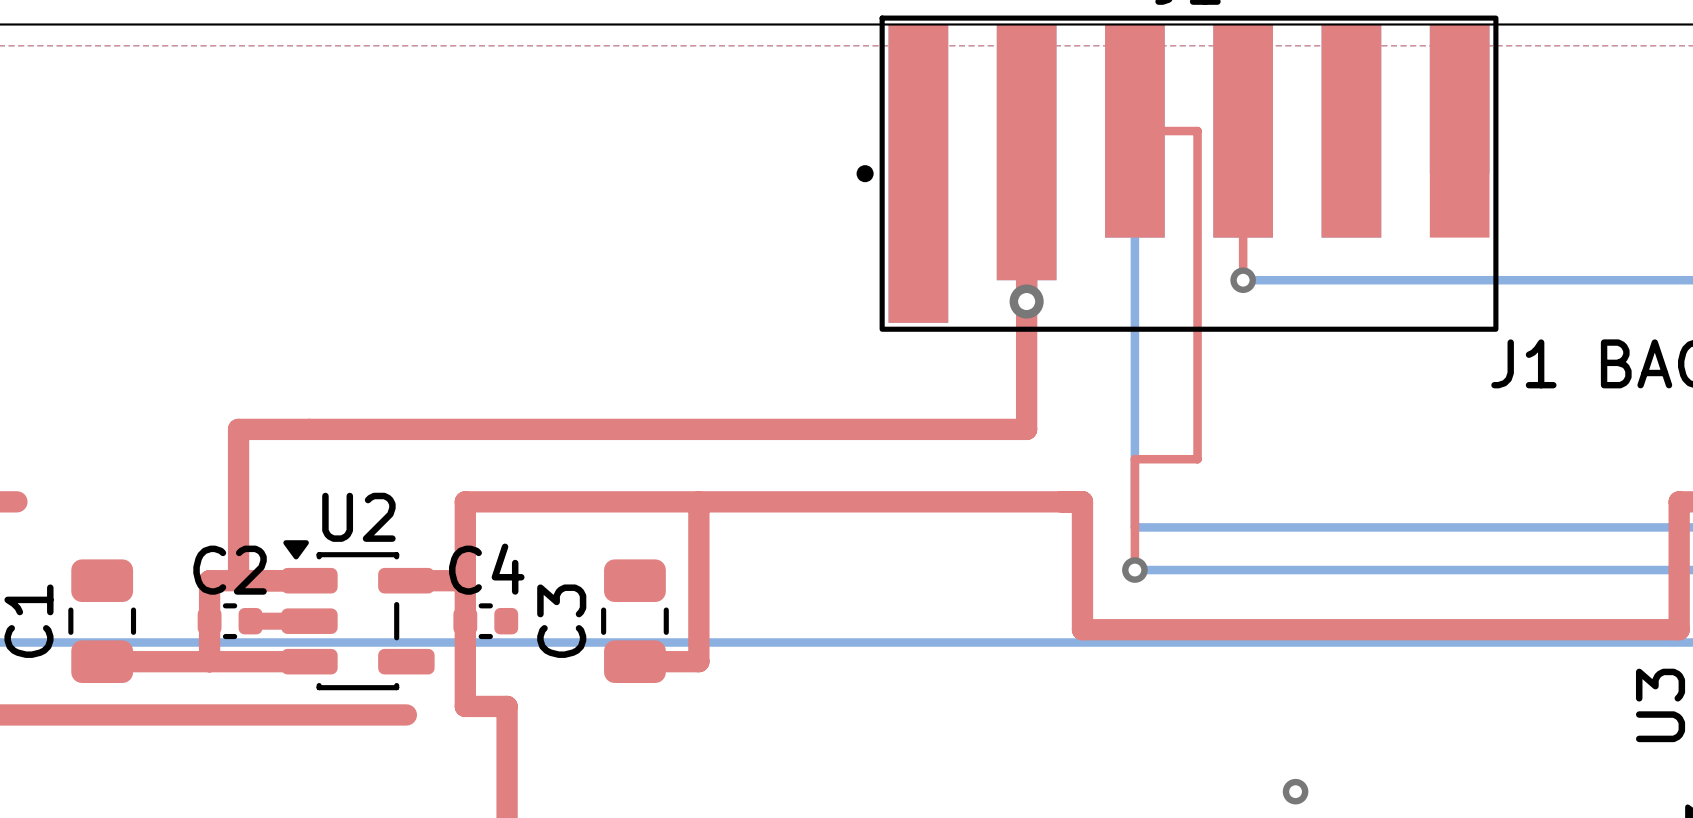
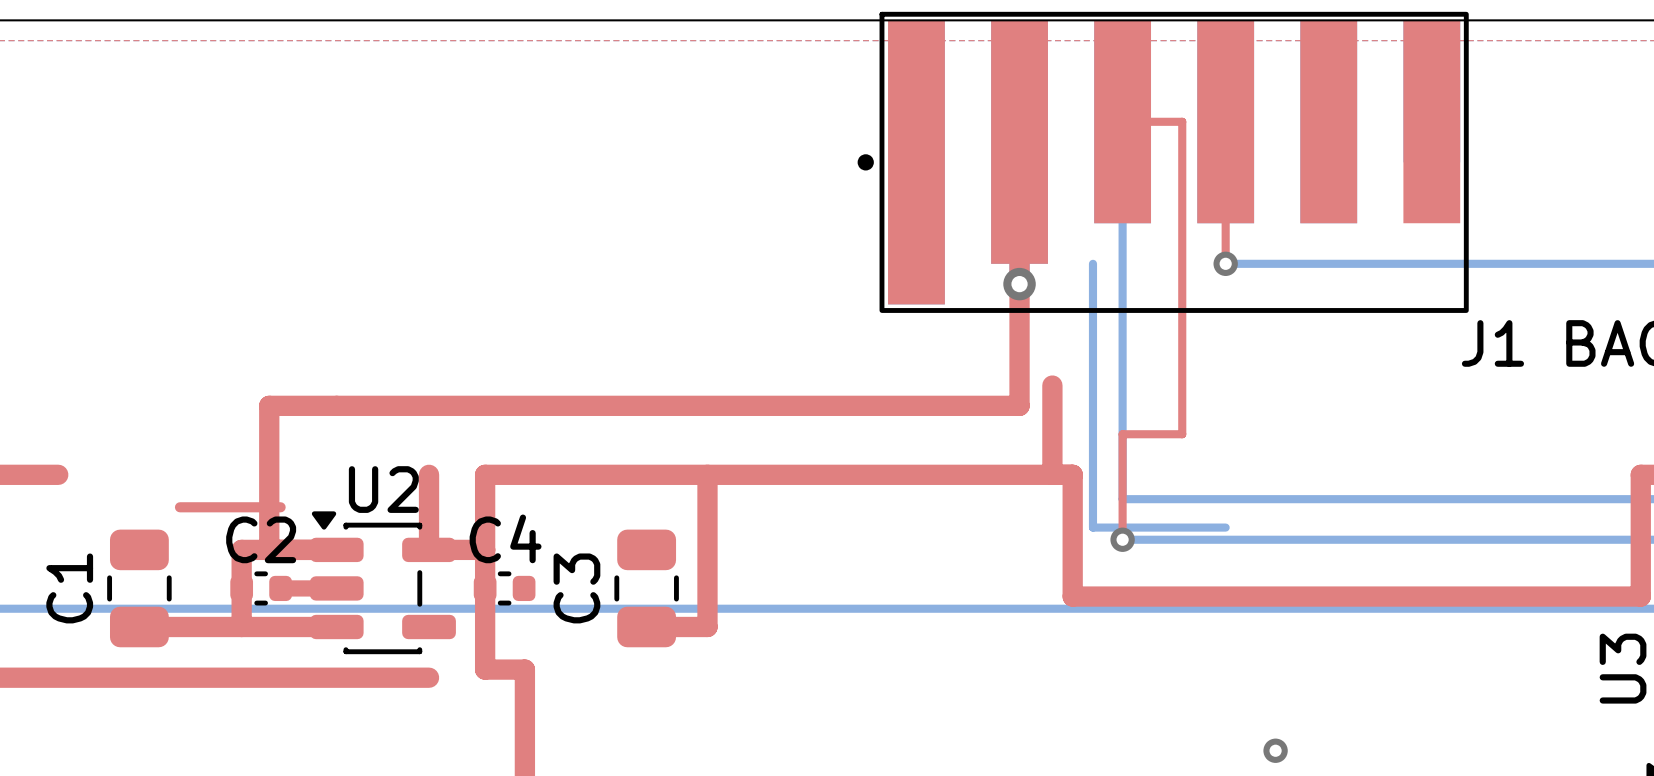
bottom track: none -> (1092, 263) (1092, 527) (1225, 527)
top track: none -> (1052, 385) (1052, 474)
top track: none -> (429, 474) (429, 549)
top track: none -> (179, 507) (280, 507)

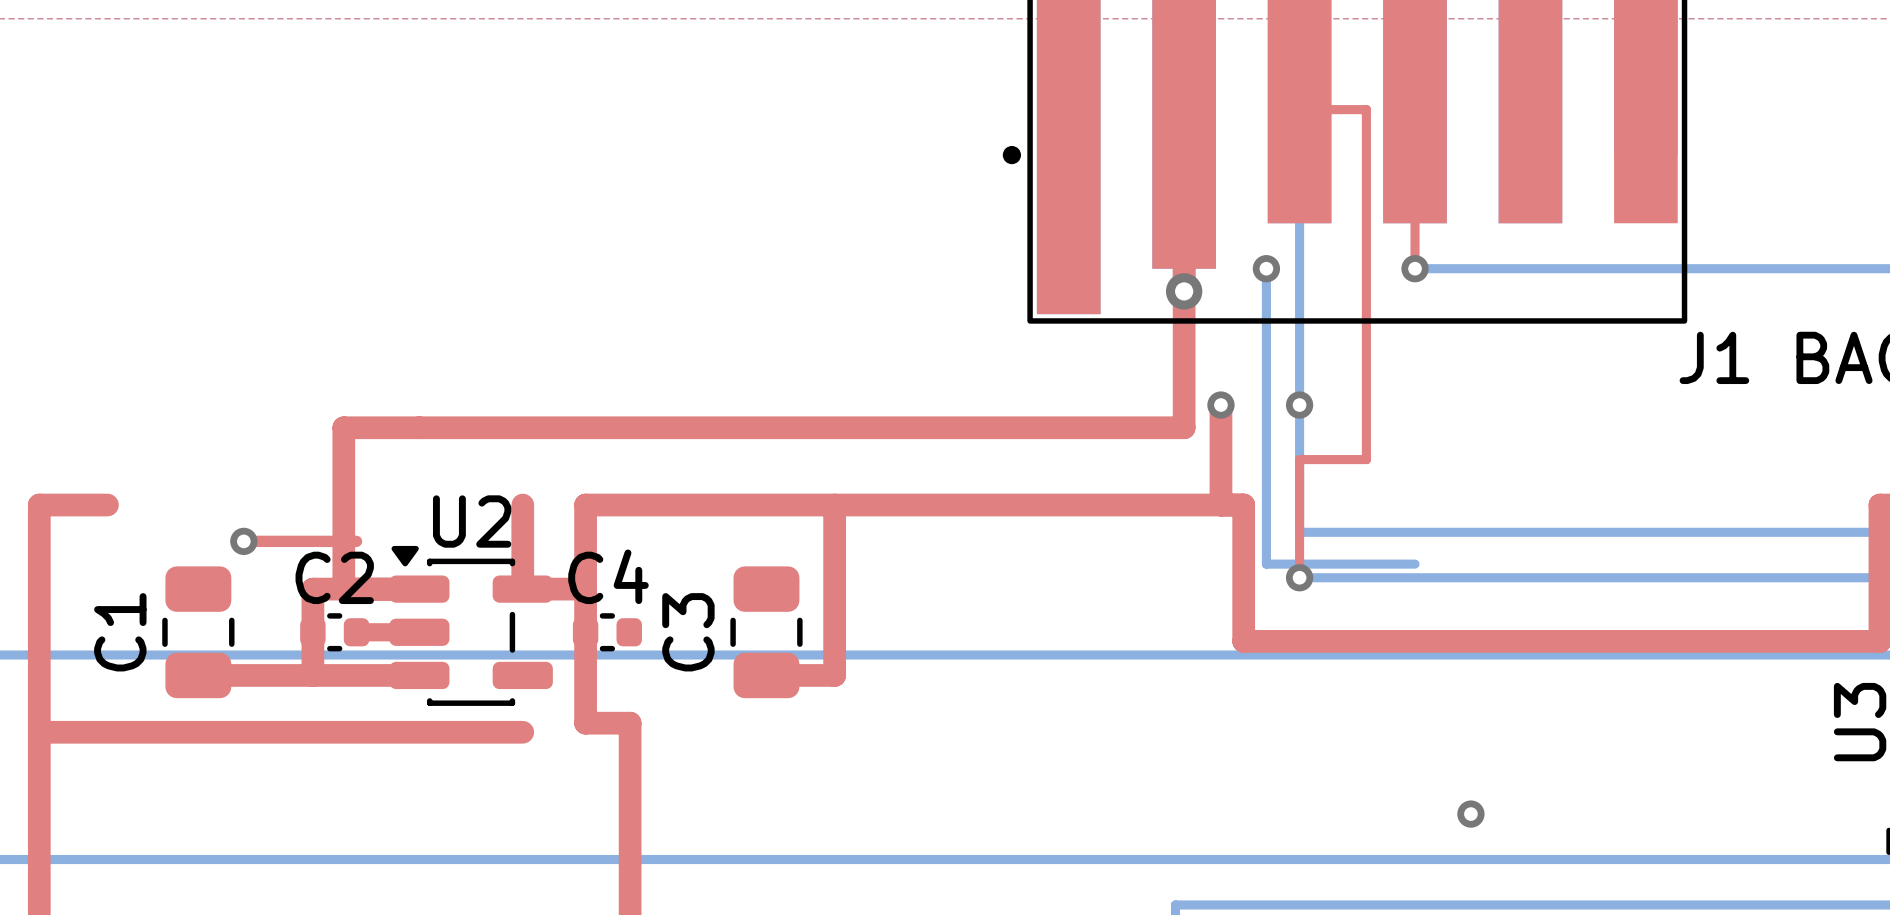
via: none -> (1266, 268)
via: none -> (1220, 405)
via: none -> (1299, 405)
via: none -> (243, 541)

